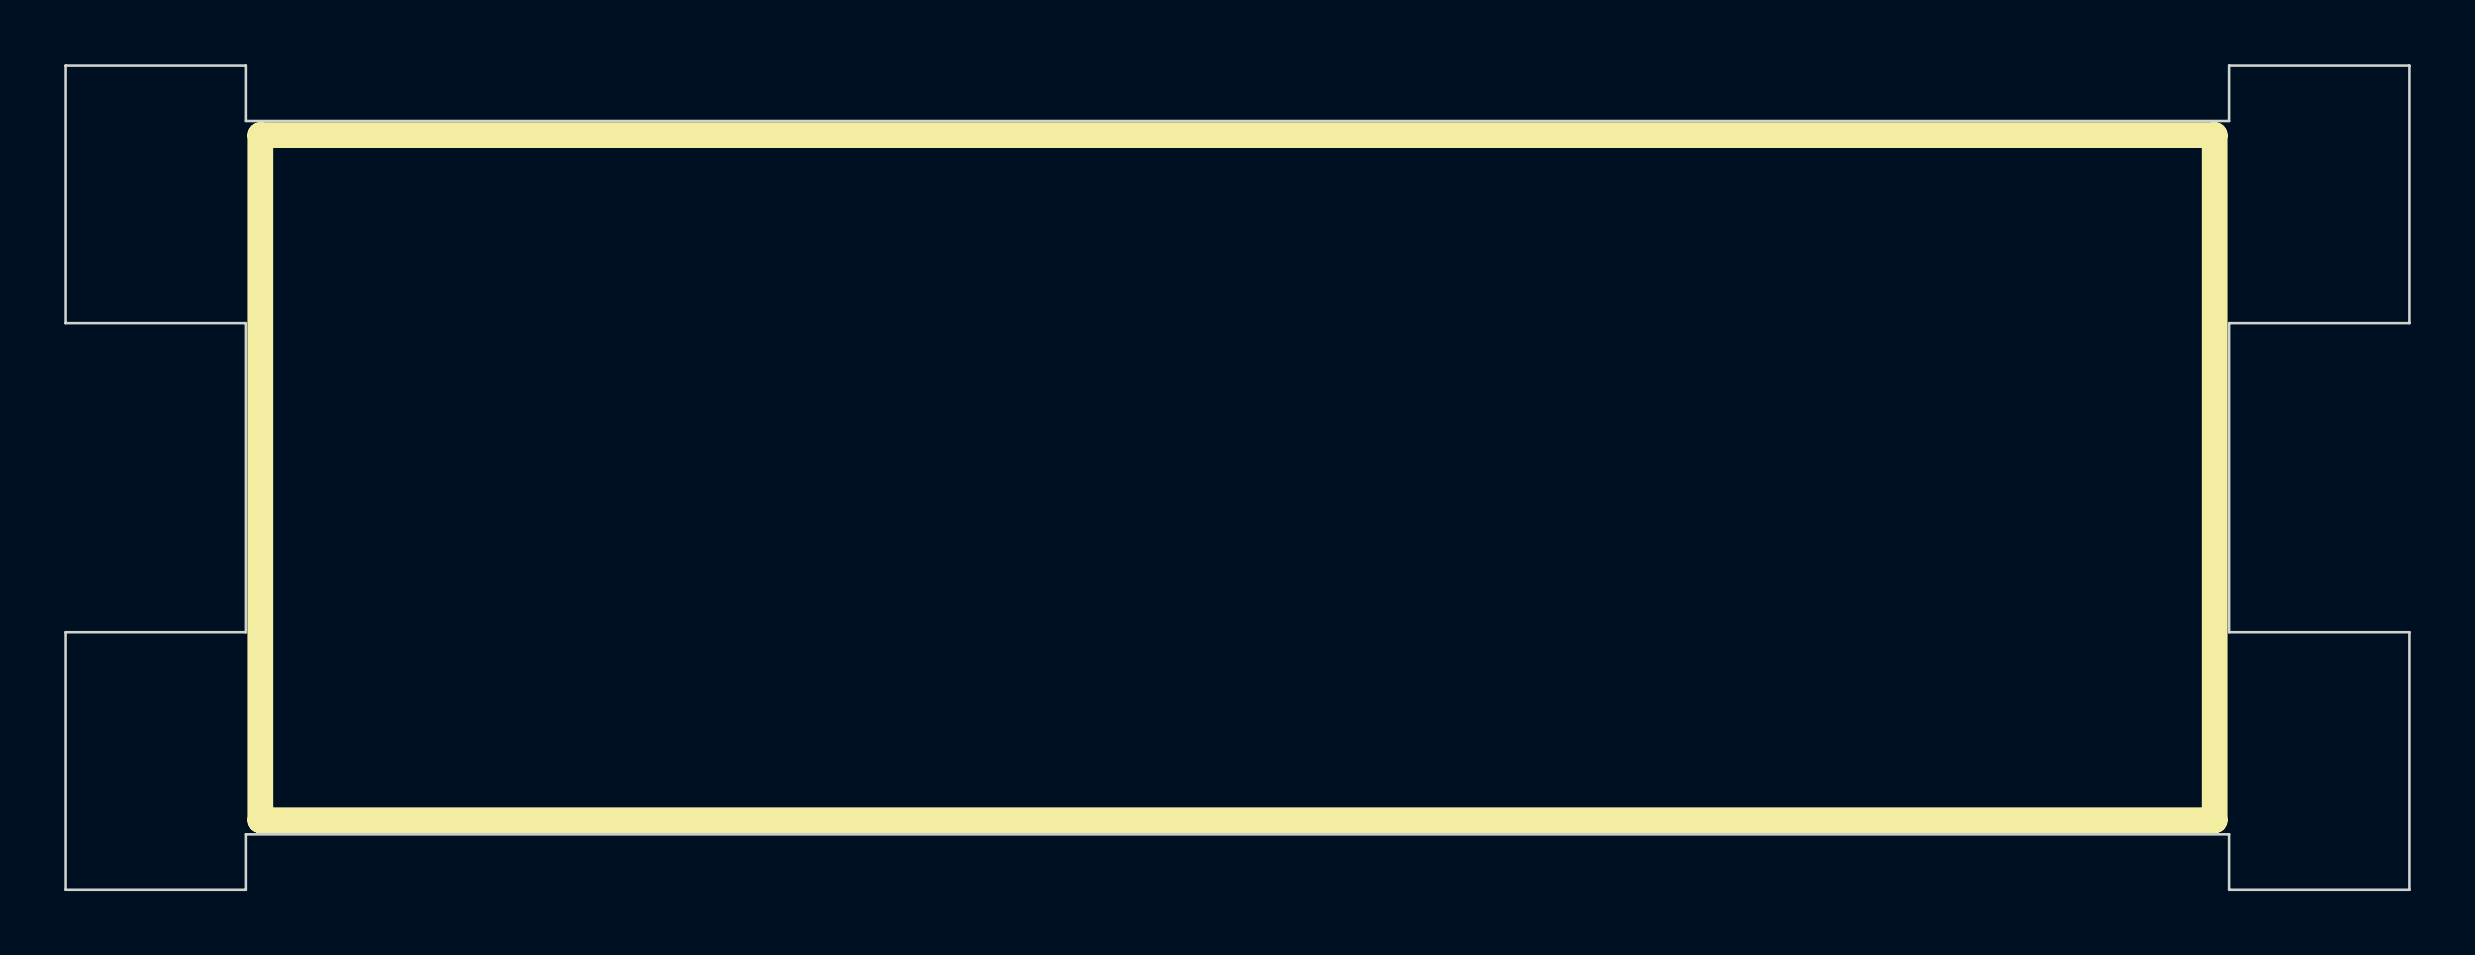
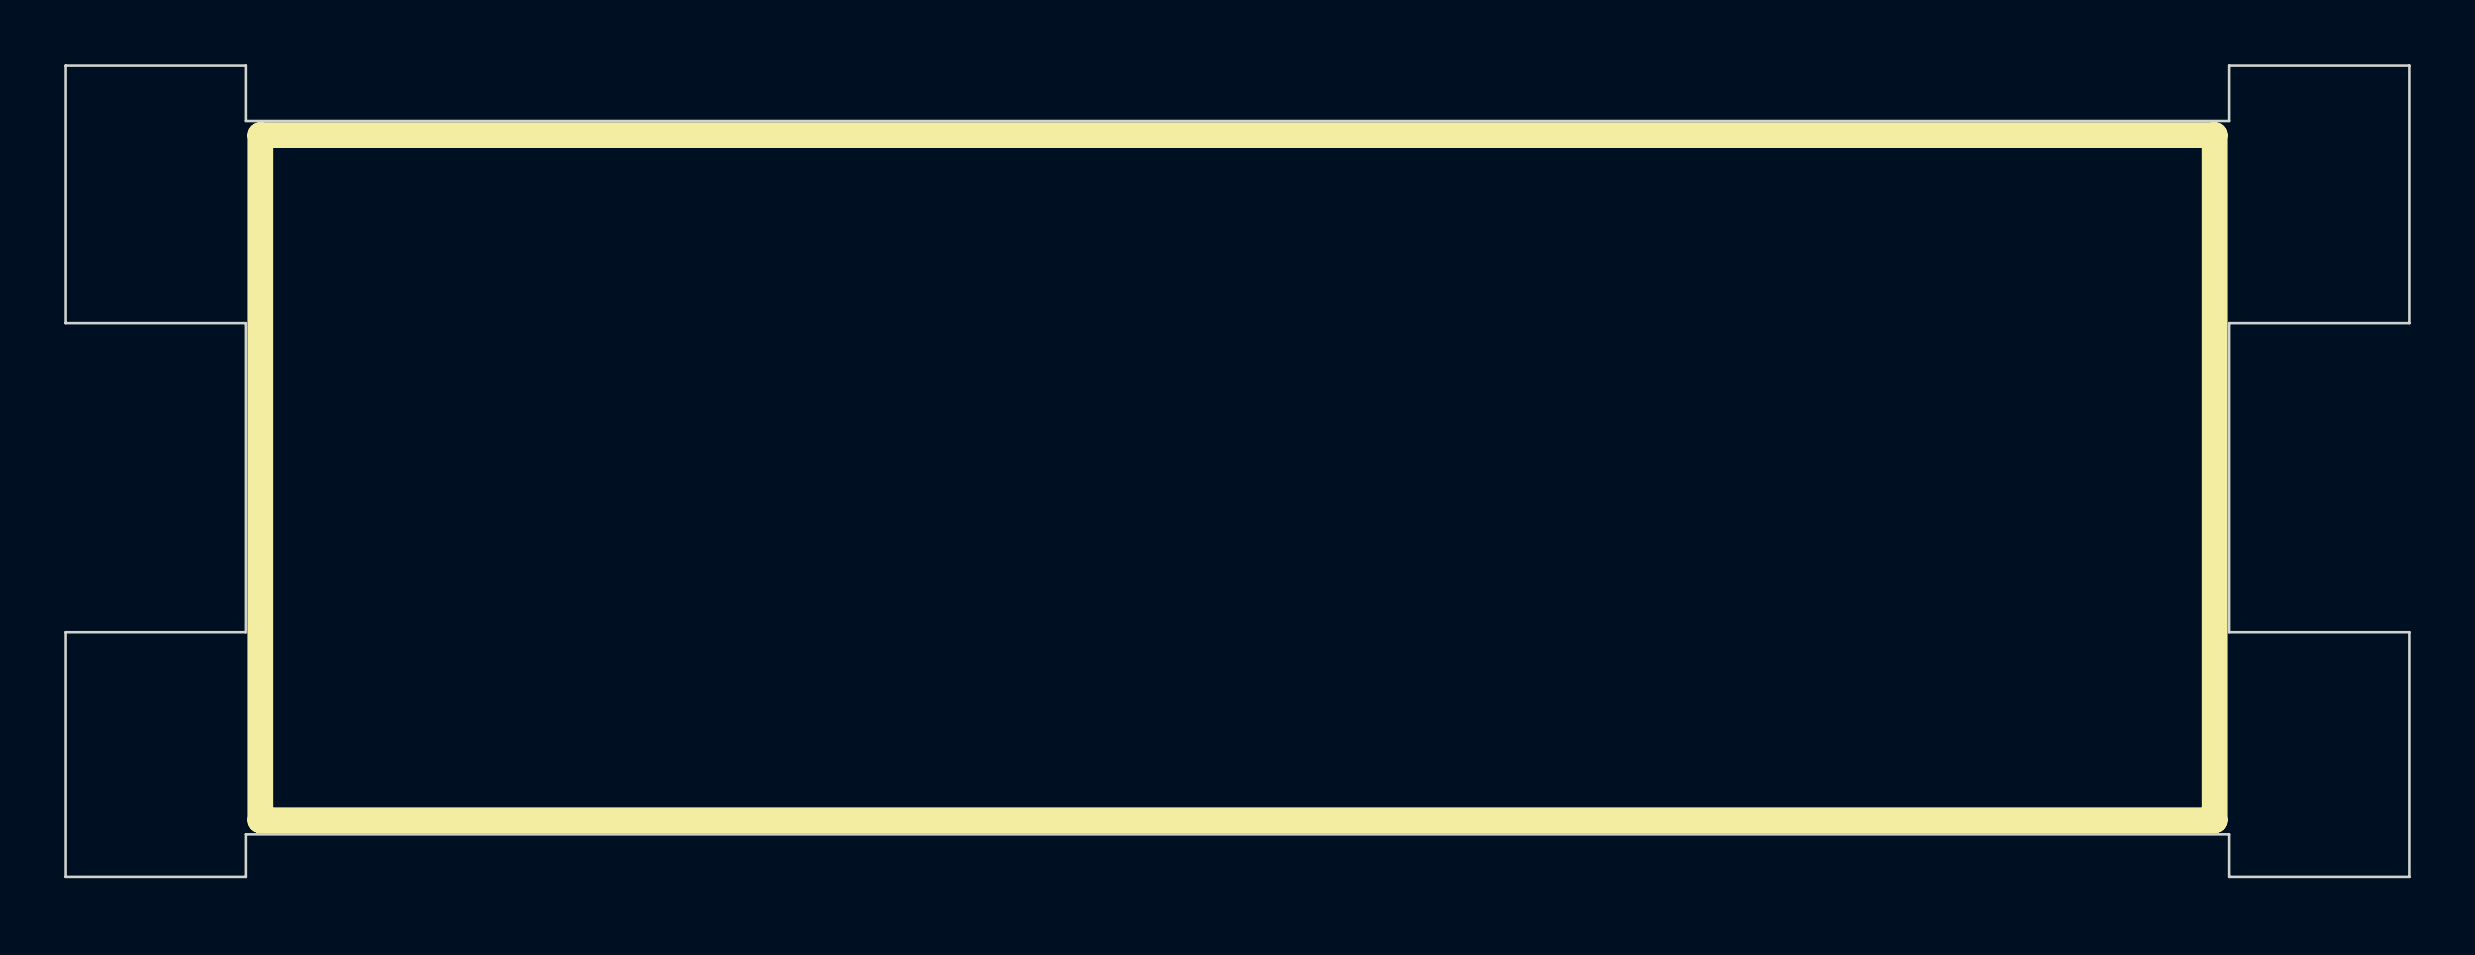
drawing shape: [64, 64, 2411, 892] -> [64, 64, 2411, 879]

